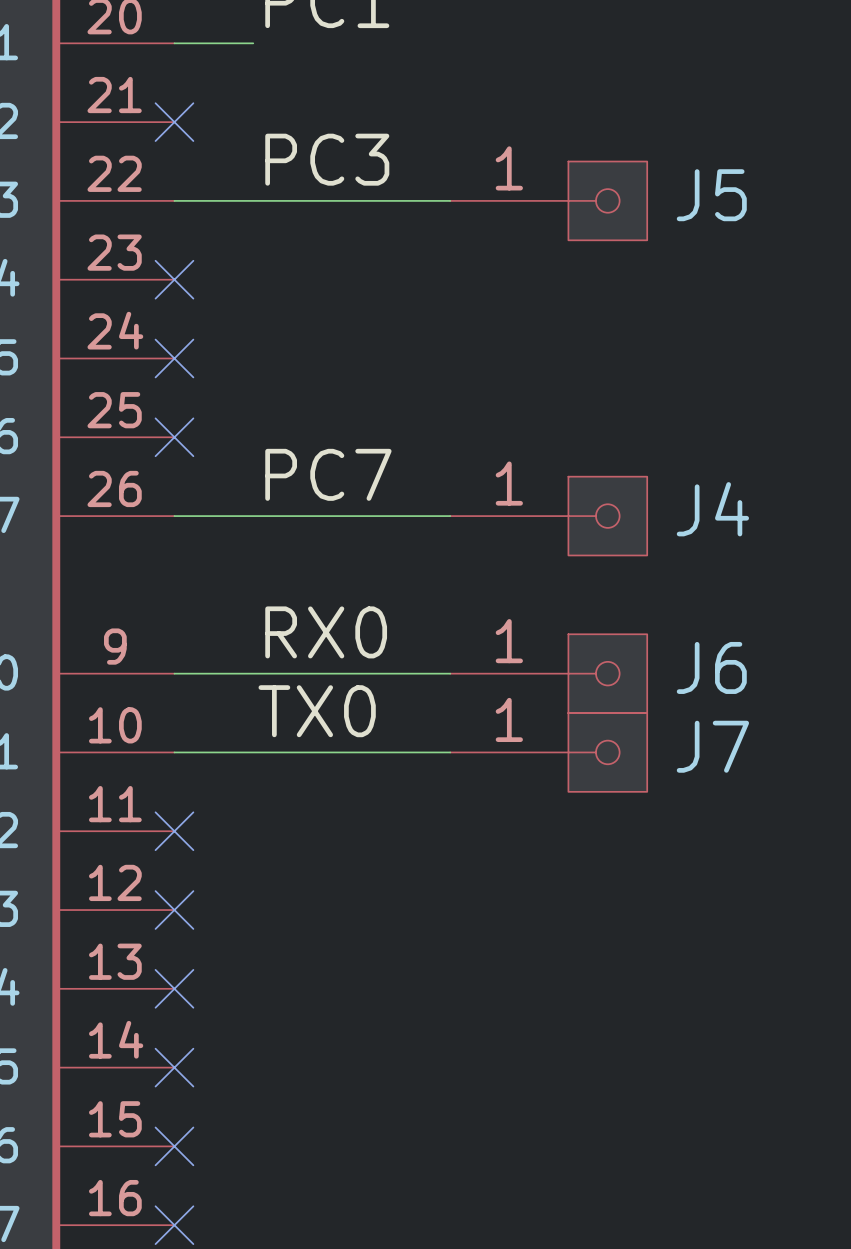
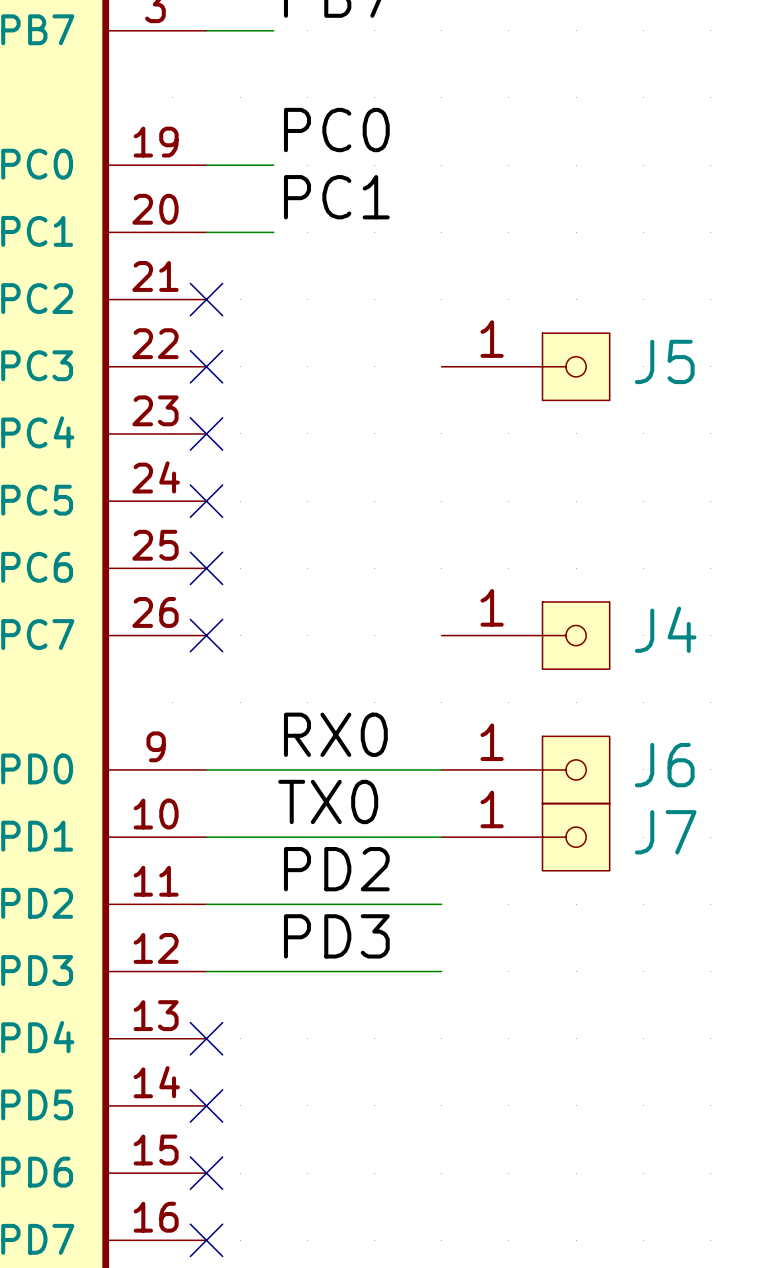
label: PC3 (327, 159) -> none
wire: (174, 200) (450, 200) -> (206, 971) (441, 971)
no-connect mark: none -> (206, 366)
label: PC7 (328, 474) -> none
wire: (174, 516) (450, 516) -> (206, 904) (441, 904)
no-connect mark: none -> (206, 635)
label: none -> PD2 (336, 869)
no-connect mark: (174, 831) -> none
label: none -> PD3 (336, 936)
no-connect mark: (174, 910) -> none

